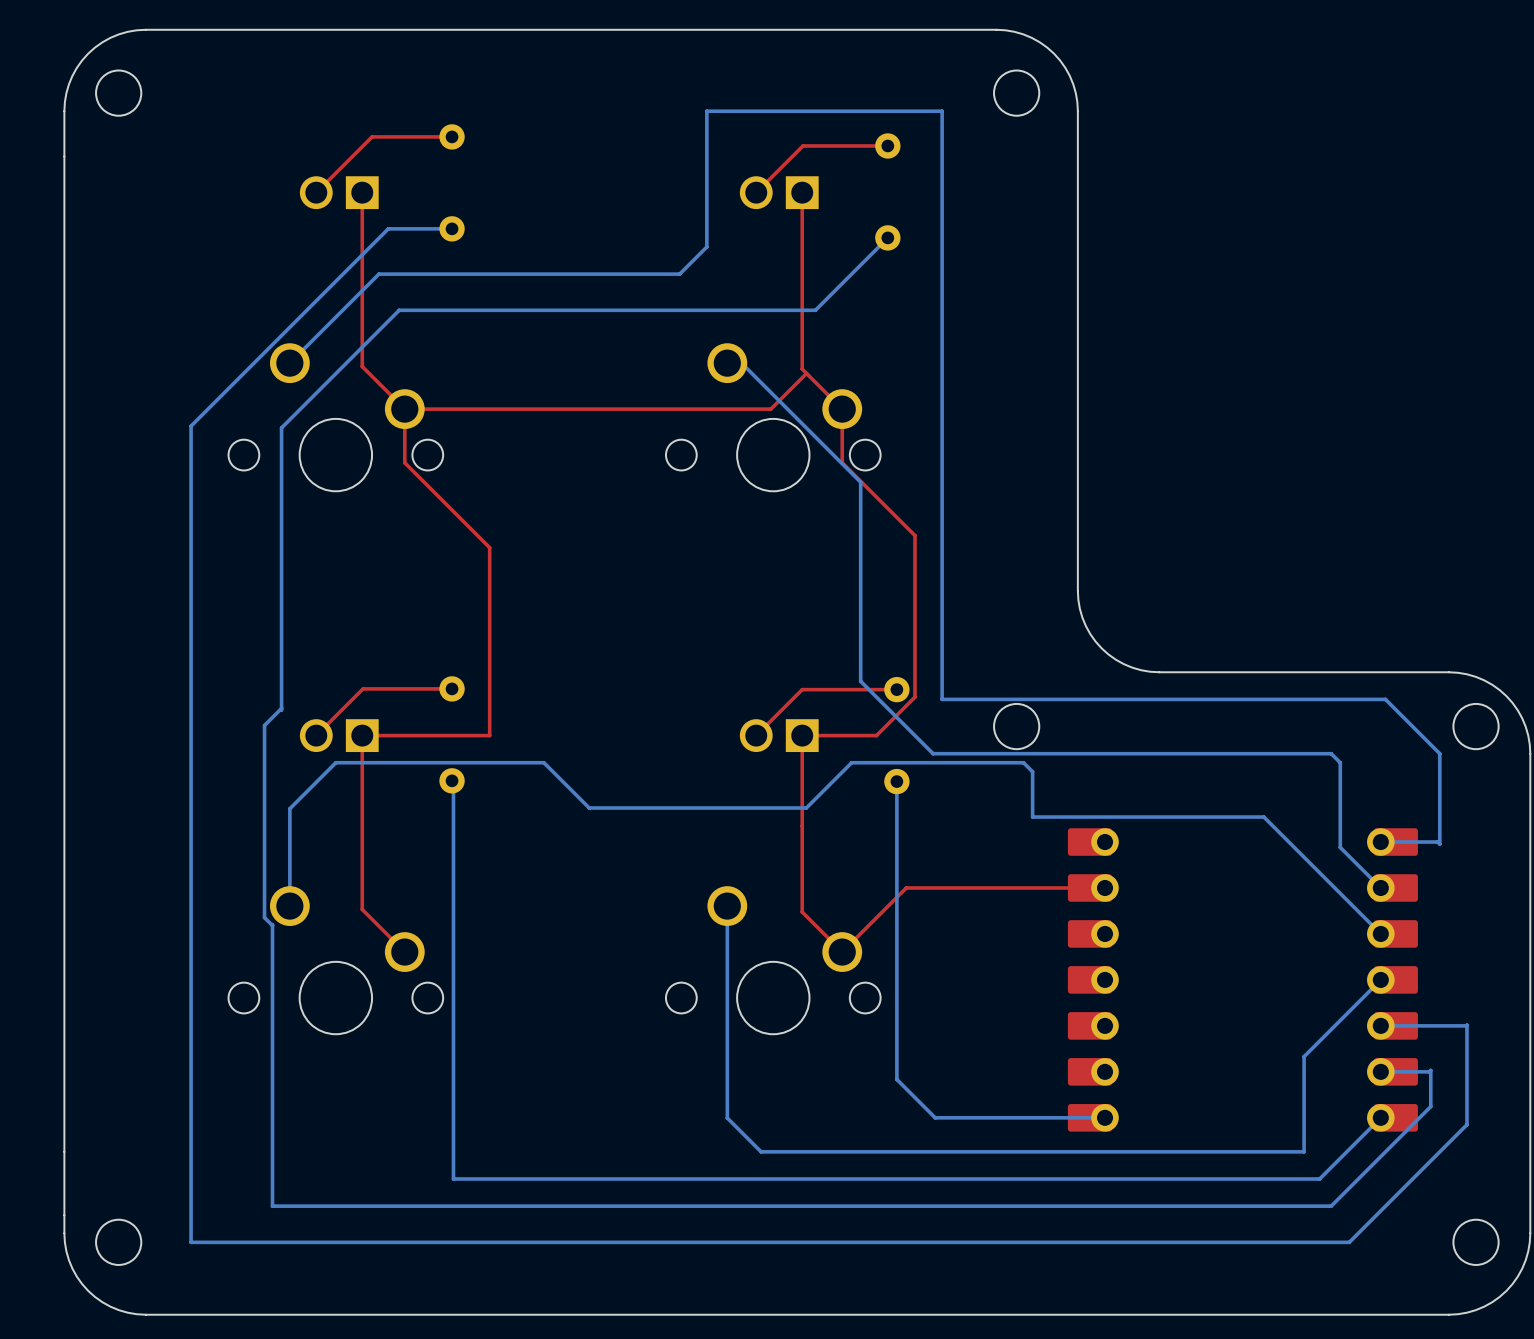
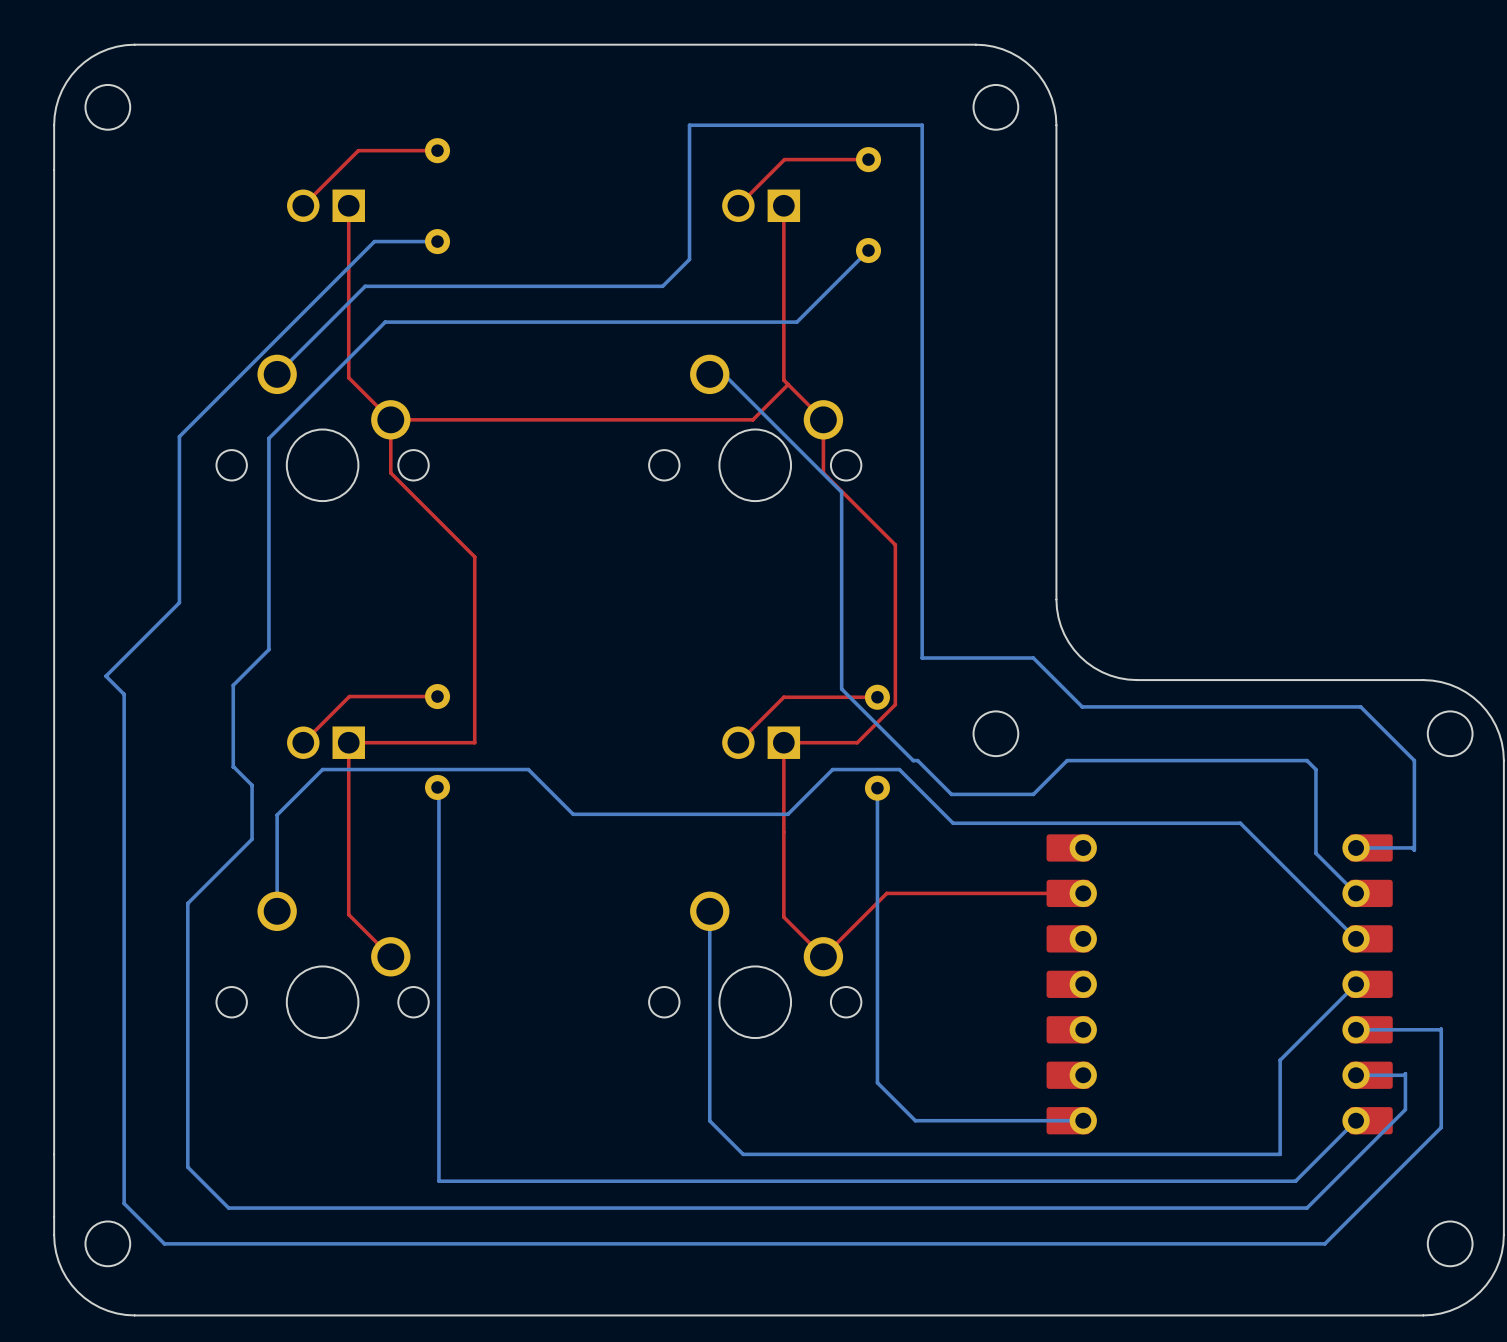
bottom track: (191, 594) (191, 1242) -> (179, 602) (105, 676) (124, 694) (124, 1203) (164, 1243) (179, 1243)
bottom track: (281, 641) (281, 710) -> none
bottom track: (942, 649) (942, 699) (1103, 699) -> (922, 658) (1033, 658) (1082, 706)
bottom track: (281, 708) (264, 725) (264, 778) -> (268, 649) (233, 685) (233, 767) (252, 785)
bottom track: (1088, 753) (937, 753) -> (1067, 760) (1033, 794) (951, 794) (917, 760)
bottom track: (919, 762) (1023, 762) (1032, 771) (1032, 817) -> (899, 769) (953, 823) (1011, 823)
bottom track: (264, 833) (264, 917) (272, 925) -> none
bottom track: (272, 924) (272, 1206) -> (252, 839) (187, 903) (187, 1167) (228, 1208) (259, 1208)

